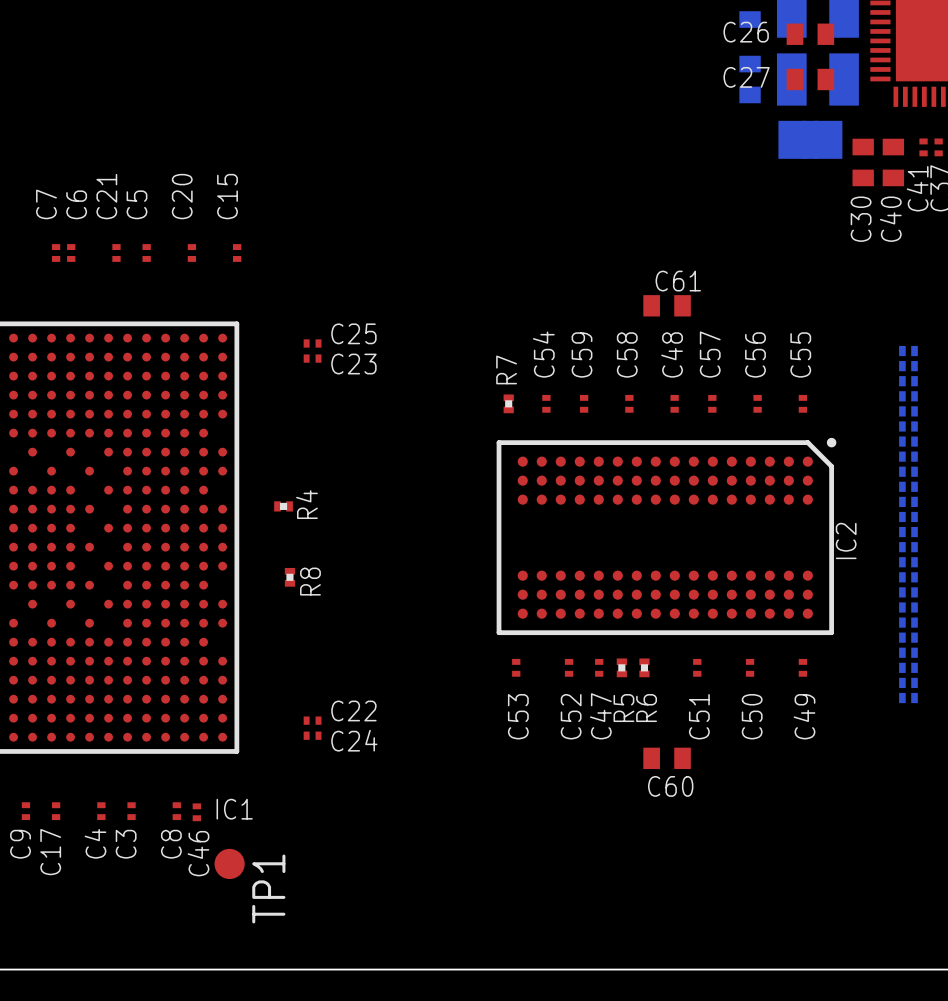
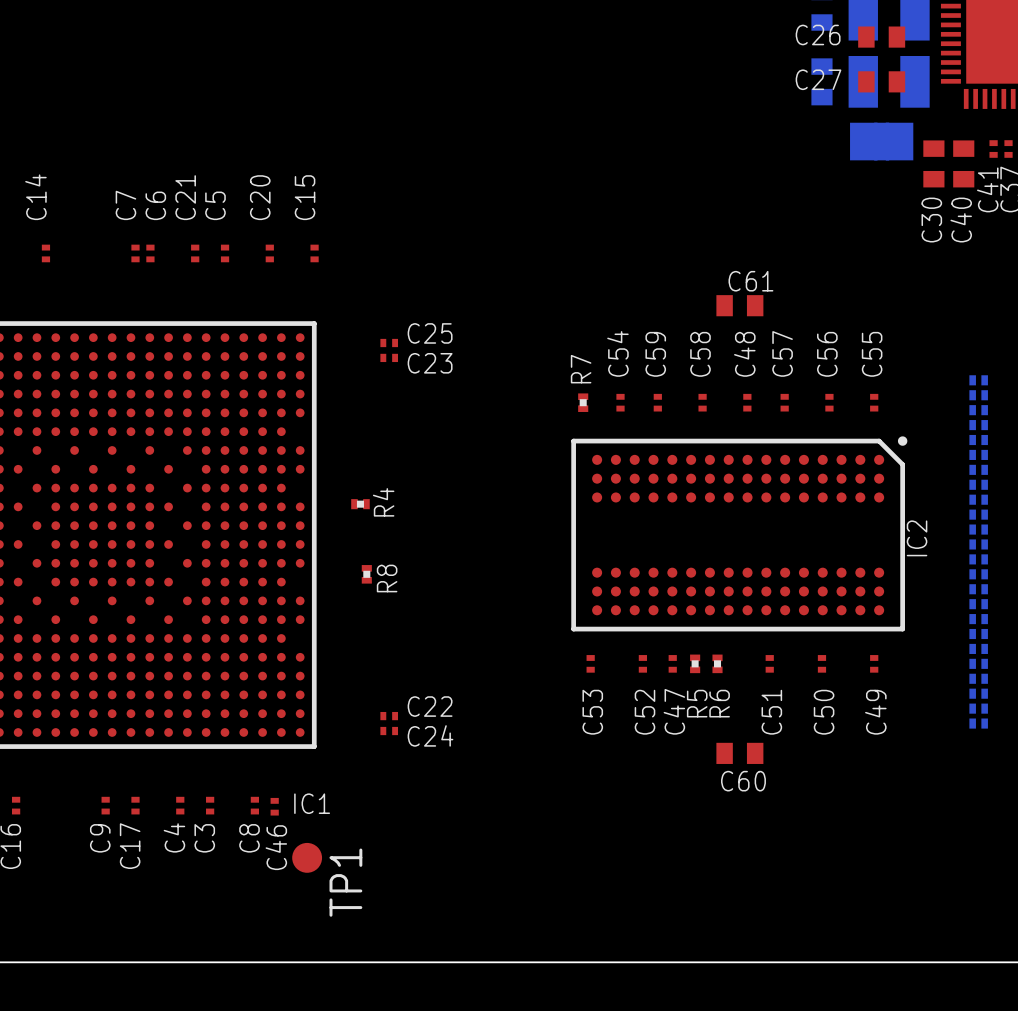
part: (908, 351) -> none
part: (908, 366) -> none
part: none -> (978, 708)
part: none -> (978, 723)

